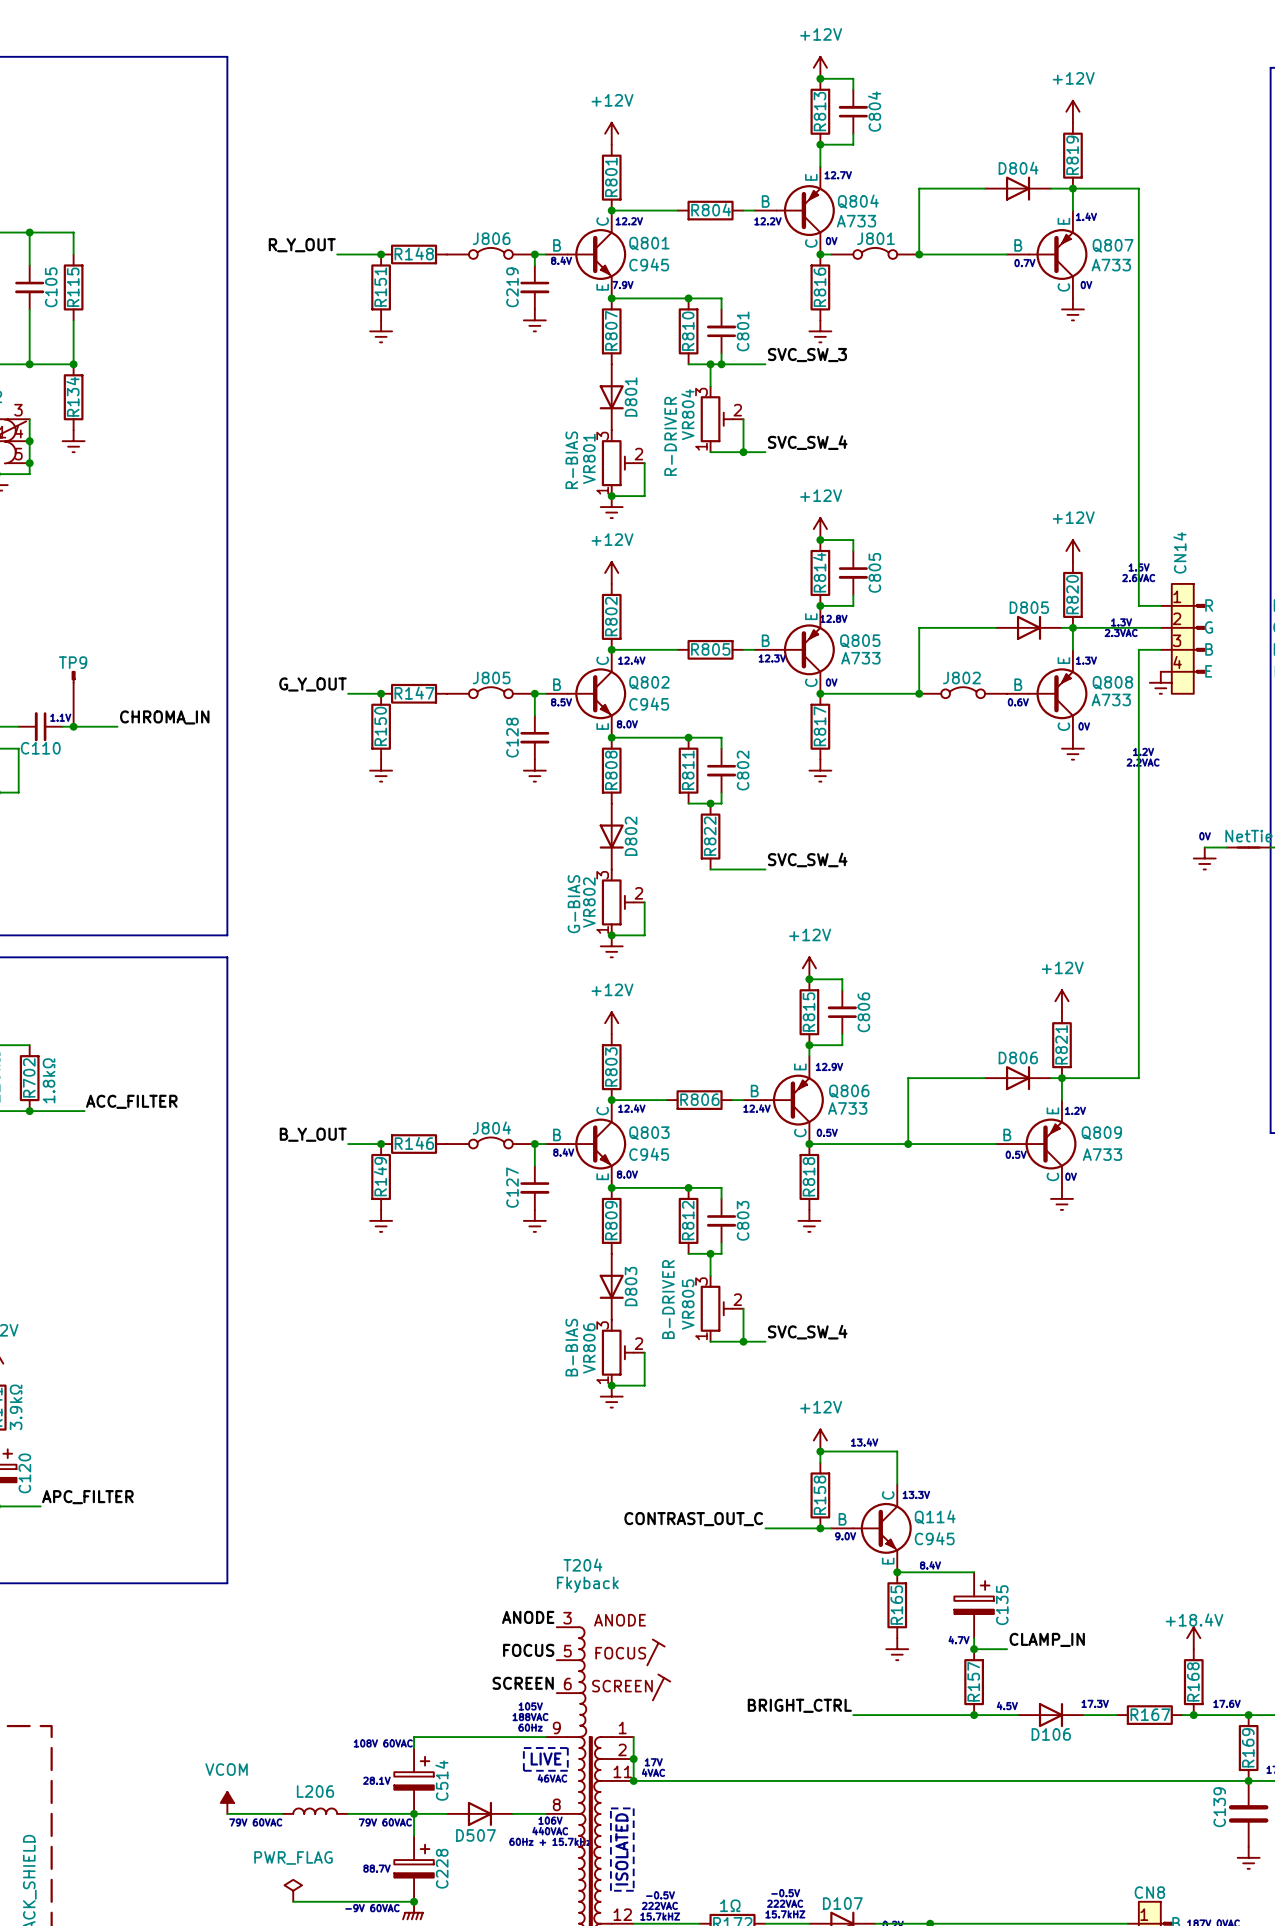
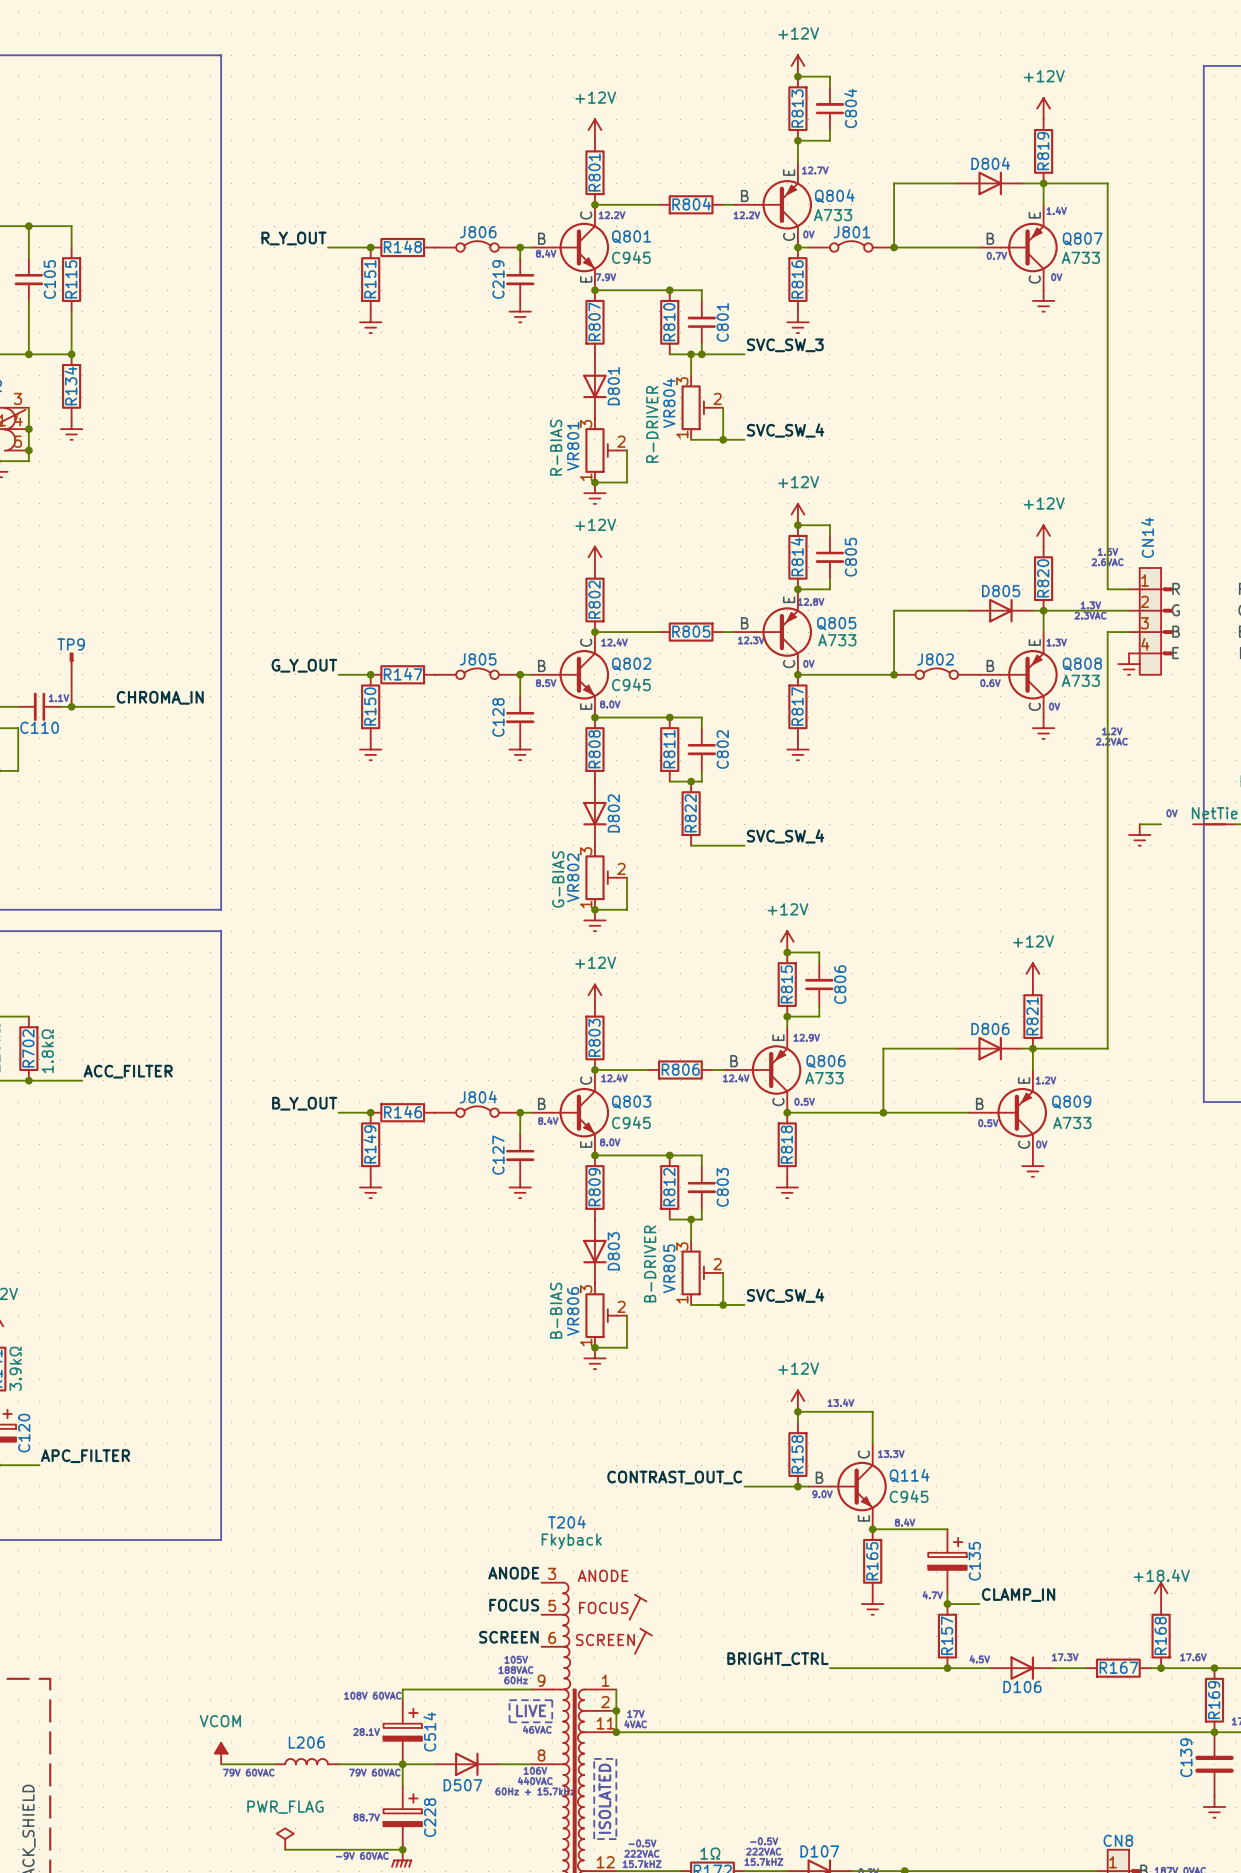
line: (1270, 67) (1270, 1133) -> (1235, 65) (1203, 65) (1203, 1102) (1235, 1102)
wire: (1204, 847) (1226, 847) -> (1139, 824) (1161, 824)
power symbol position: (1204, 858) -> (1139, 835)

